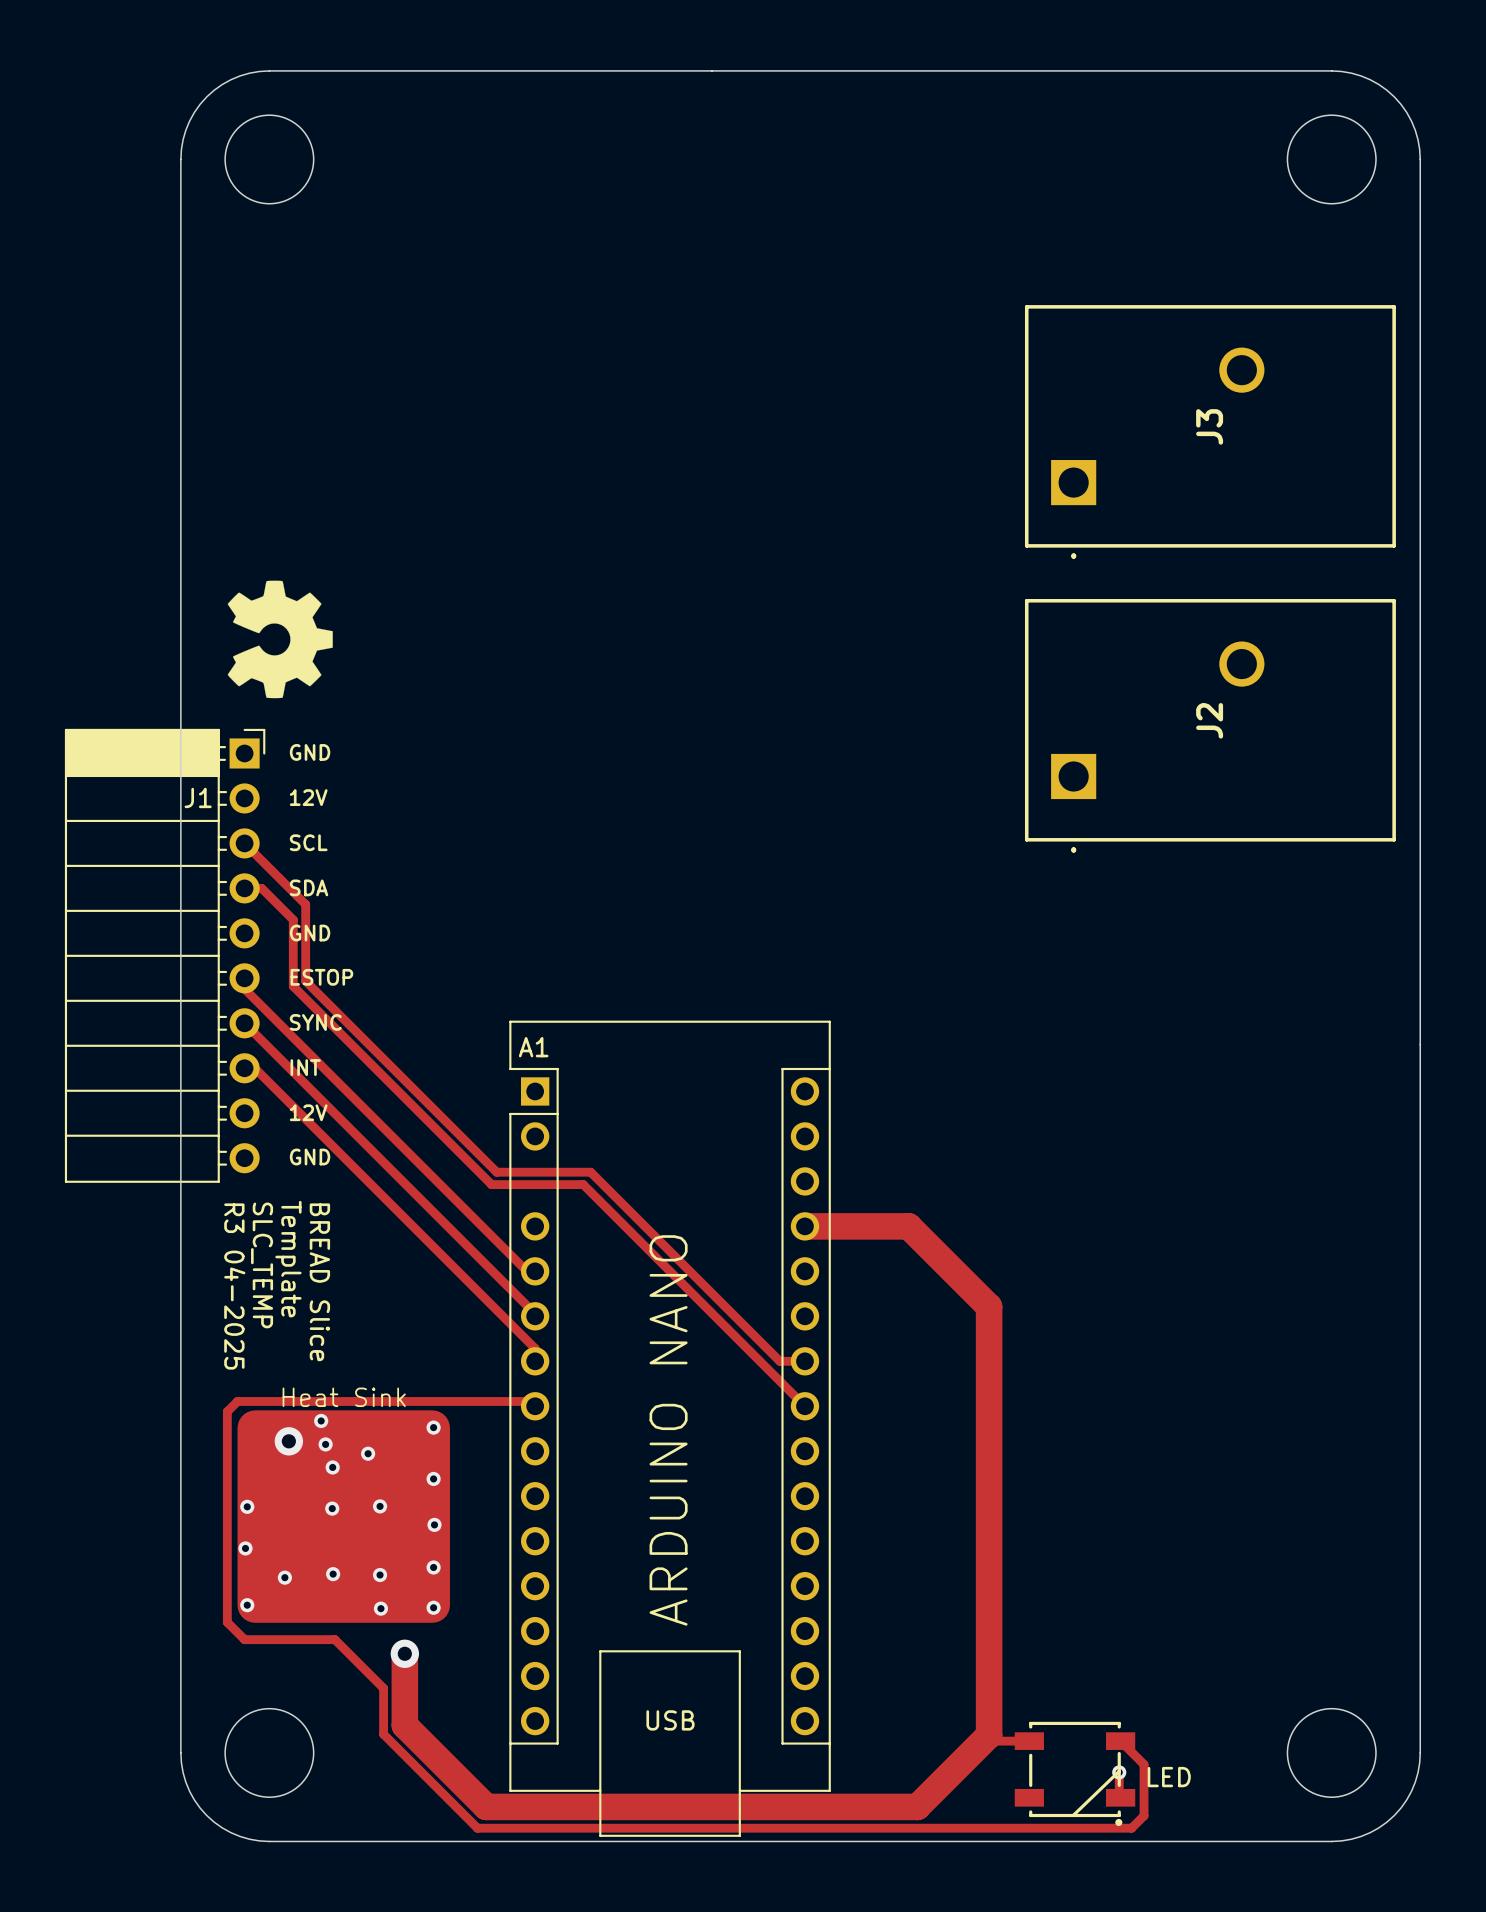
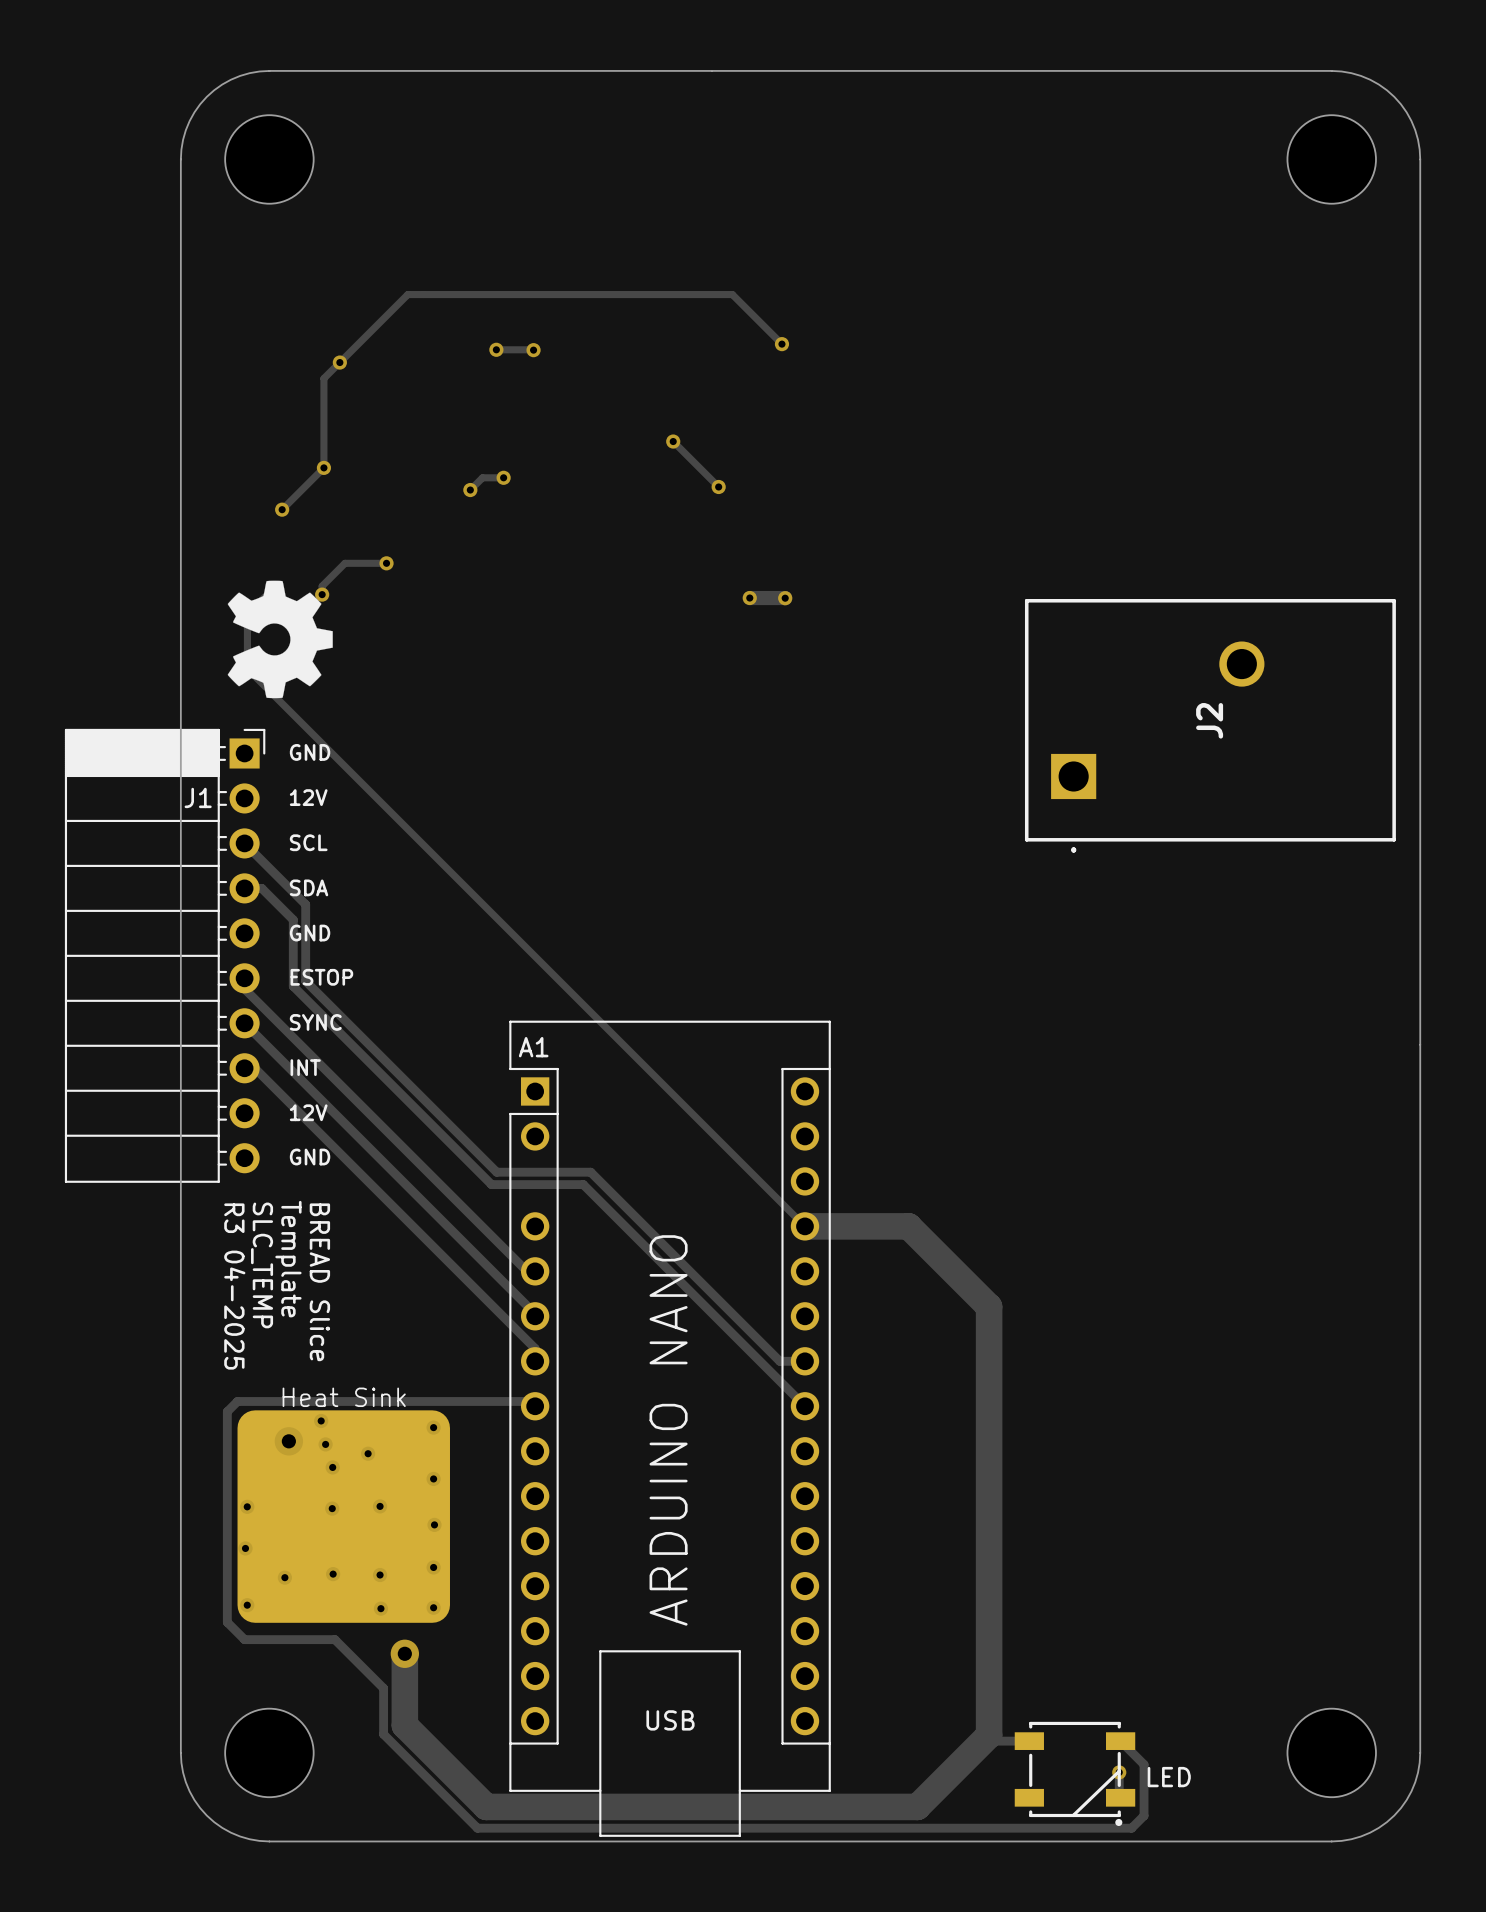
track: none -> (781, 344) (732, 294) (407, 294) (323, 378) (323, 467) (282, 509)
via: none -> (781, 344)
track: none -> (496, 349) (533, 350)
via: none -> (496, 349)
via: none -> (533, 350)
via: none -> (339, 362)
J3: (1210, 431) -> none
track: none -> (673, 441) (718, 486)
via: none -> (673, 441)
via: none -> (323, 467)
track: none -> (503, 477) (482, 477) (470, 490)
via: none -> (503, 477)
via: none -> (718, 486)
via: none -> (470, 490)
via: none -> (282, 509)
track: none -> (386, 563) (345, 563) (322, 586) (322, 594)
via: none -> (386, 563)
track: none -> (268, 593) (247, 614) (247, 668) (804, 1226)
via: none -> (322, 594)
track: none -> (749, 598) (785, 598)
via: none -> (749, 598)
via: none -> (785, 598)

